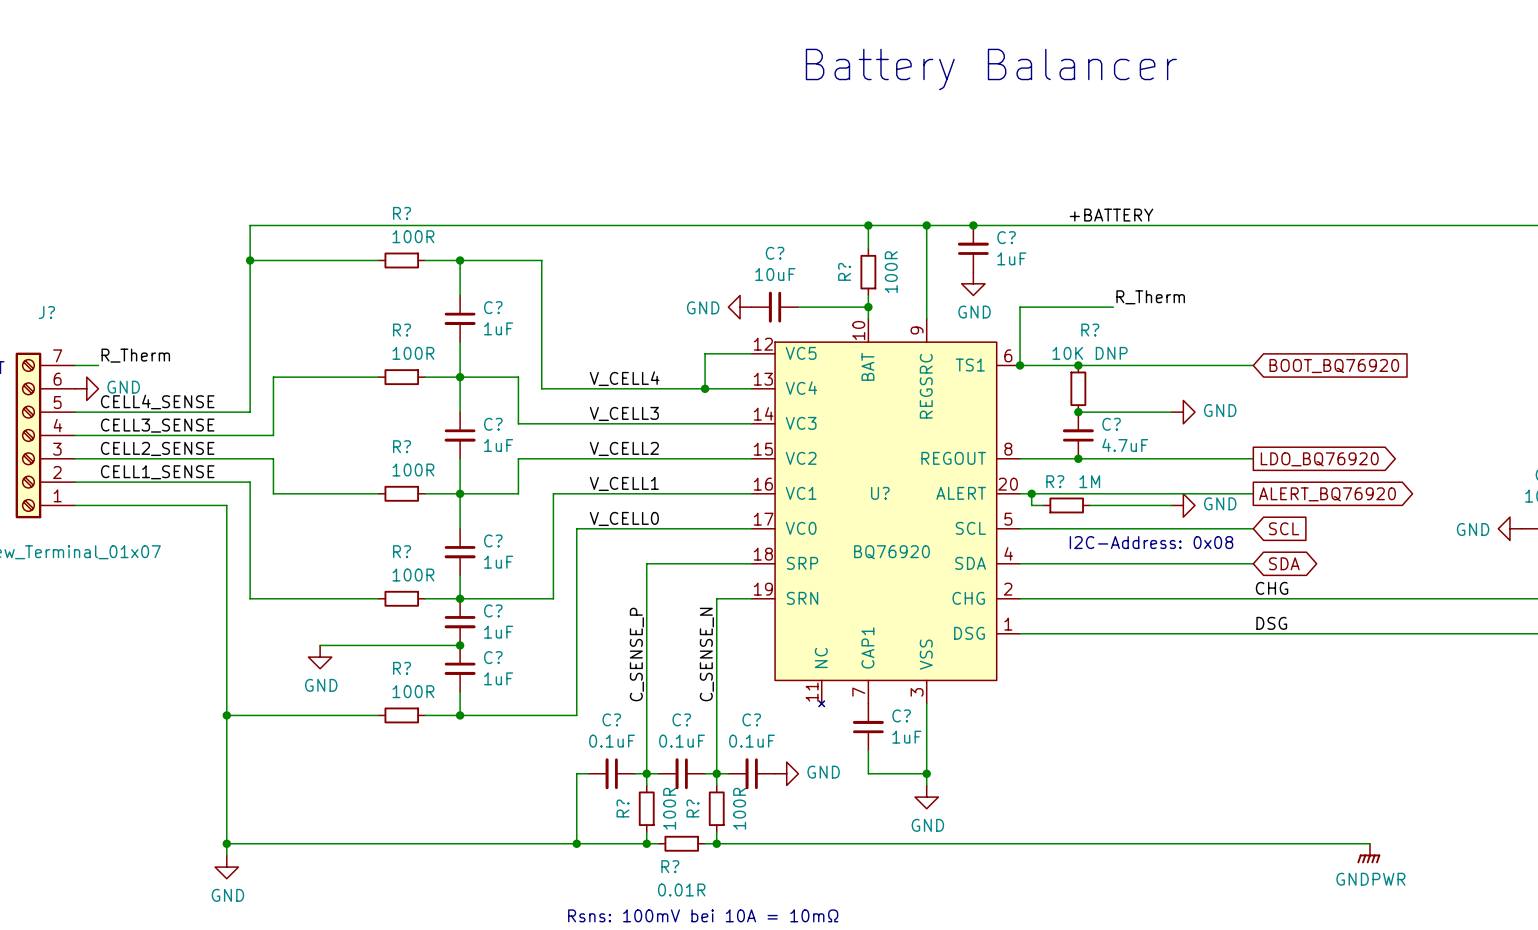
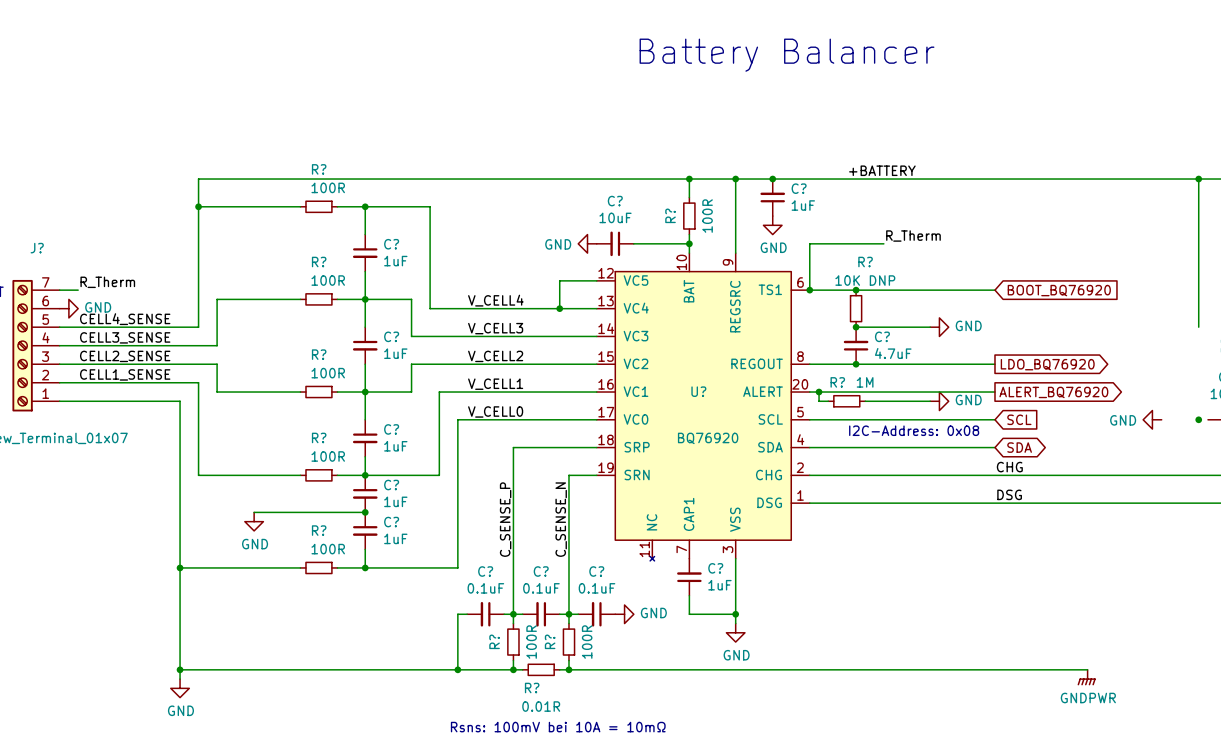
wire: none -> (1198, 179) (1198, 327)
junction: none -> (1198, 179)
power symbol position: GND (1509, 528) -> GND (1152, 419)
junction: none -> (1198, 419)

